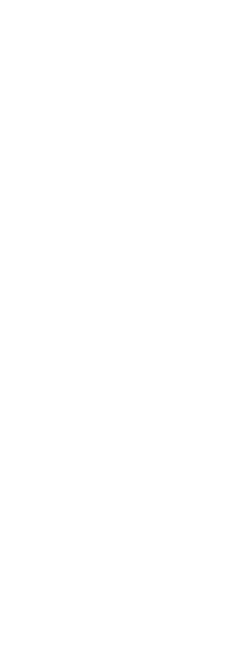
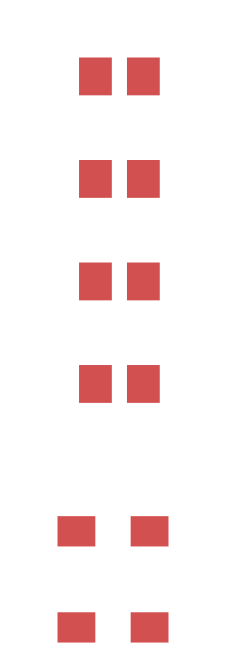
part: none -> (119, 76)
part: none -> (119, 178)
part: none -> (119, 281)
part: none -> (119, 383)
part: none -> (112, 531)
part: none -> (112, 627)

